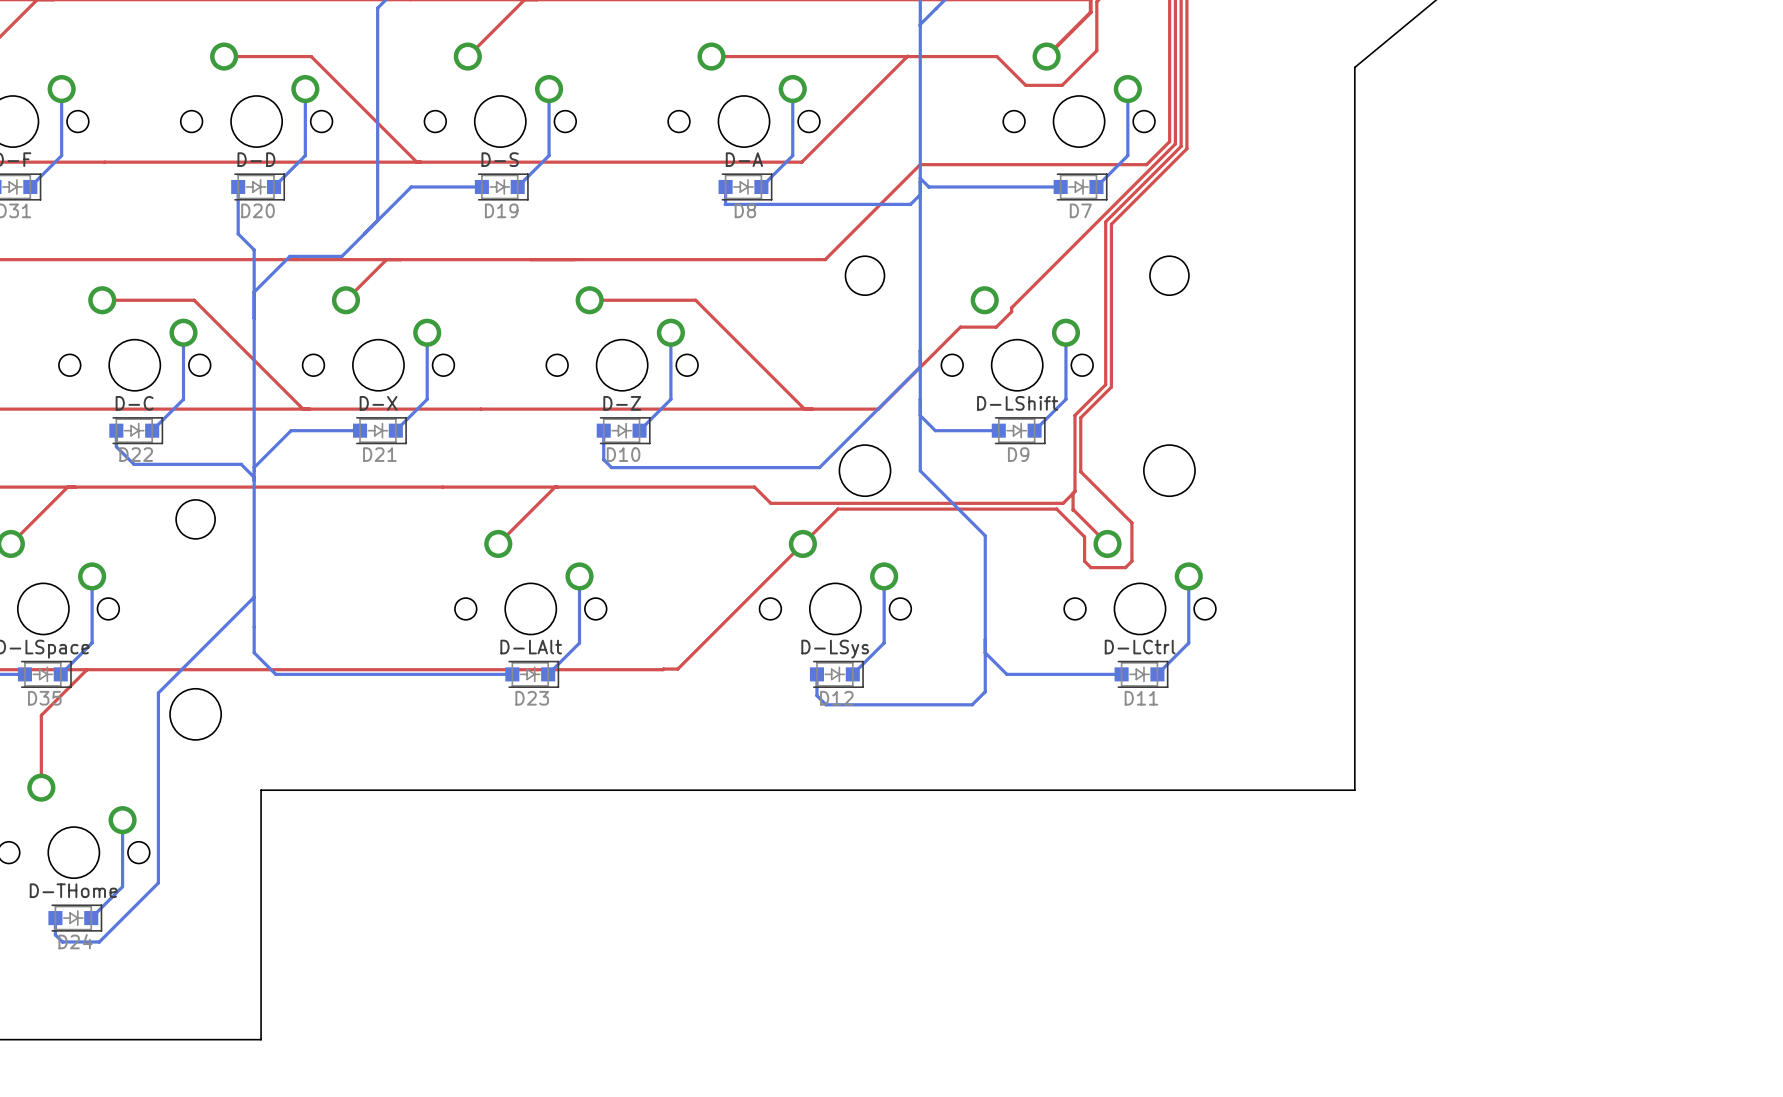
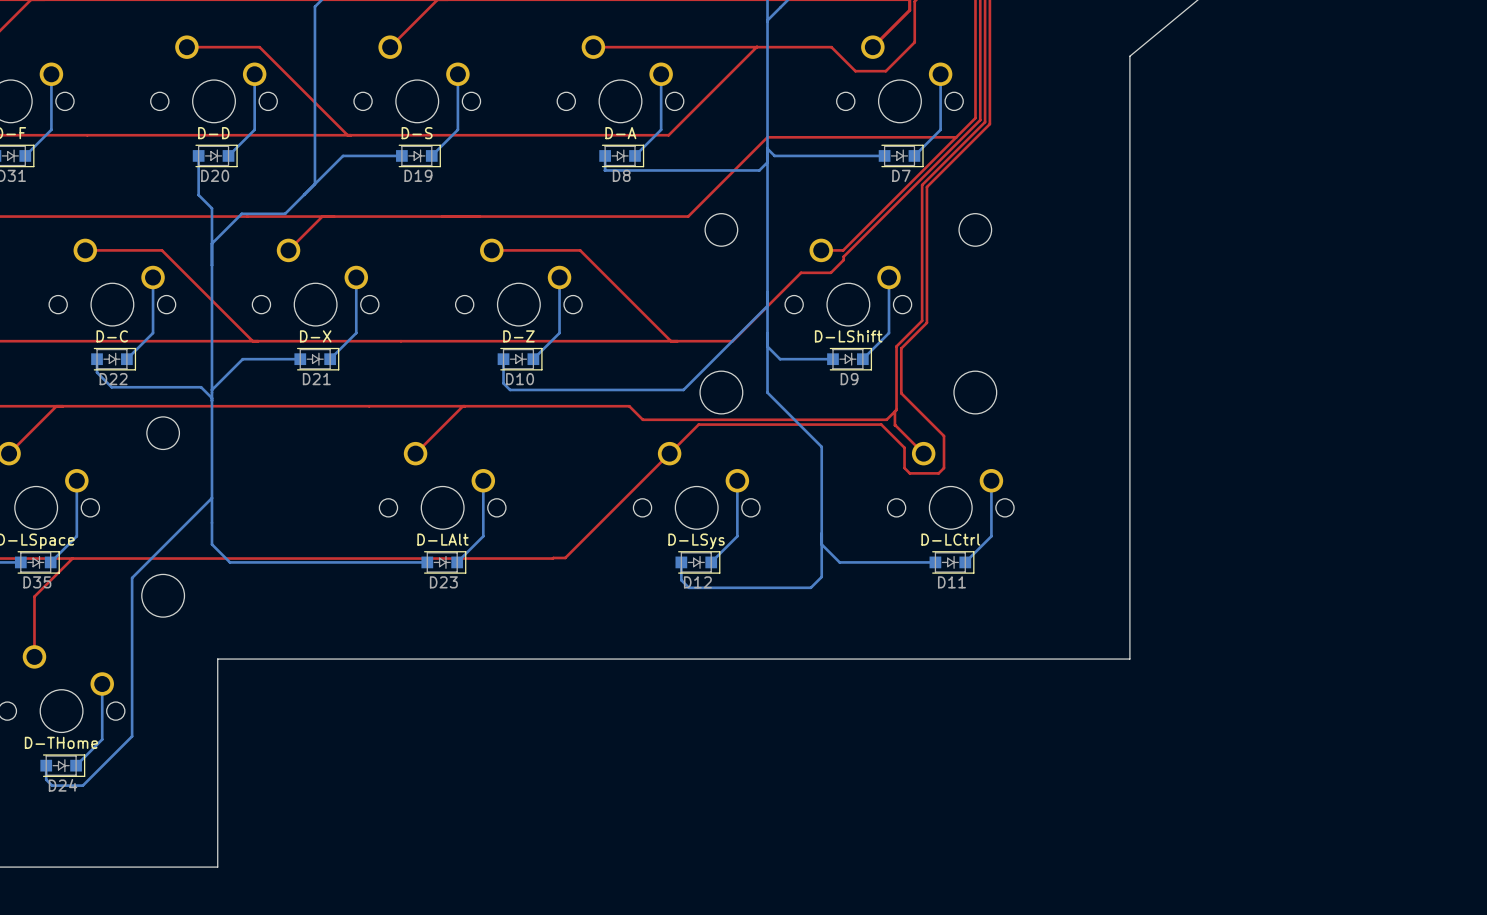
top track: none -> (956, 137) (843, 250) (821, 250)

